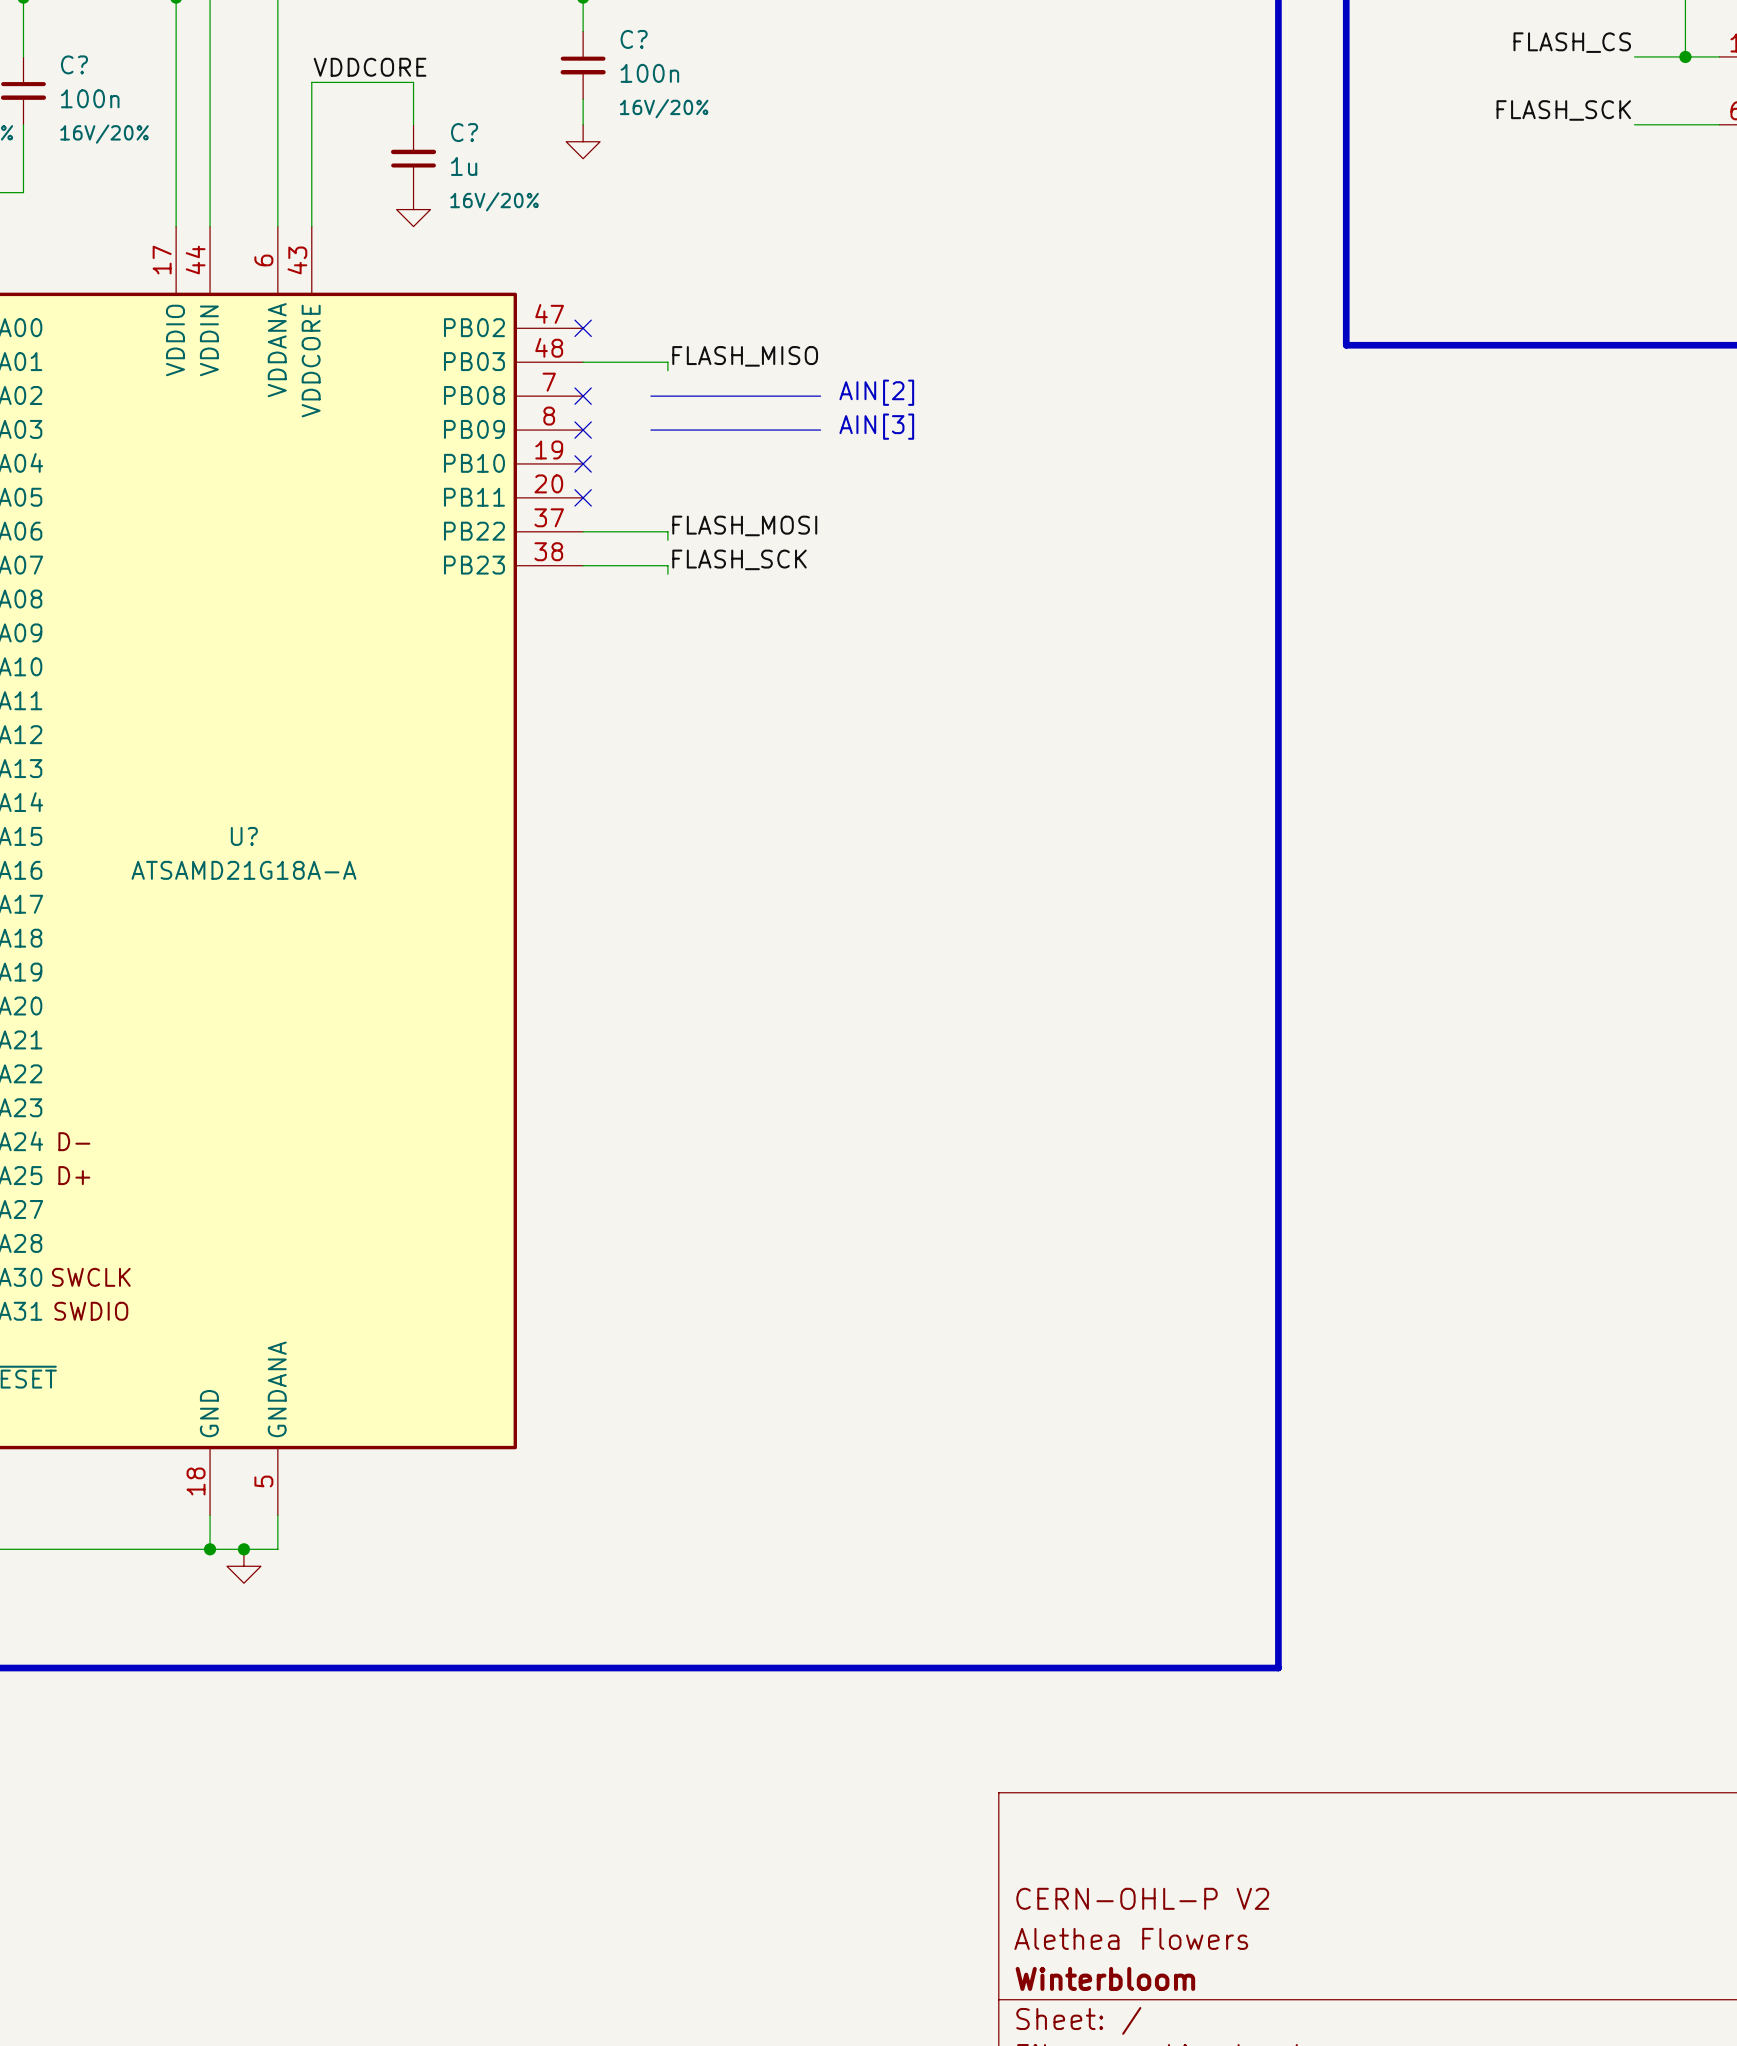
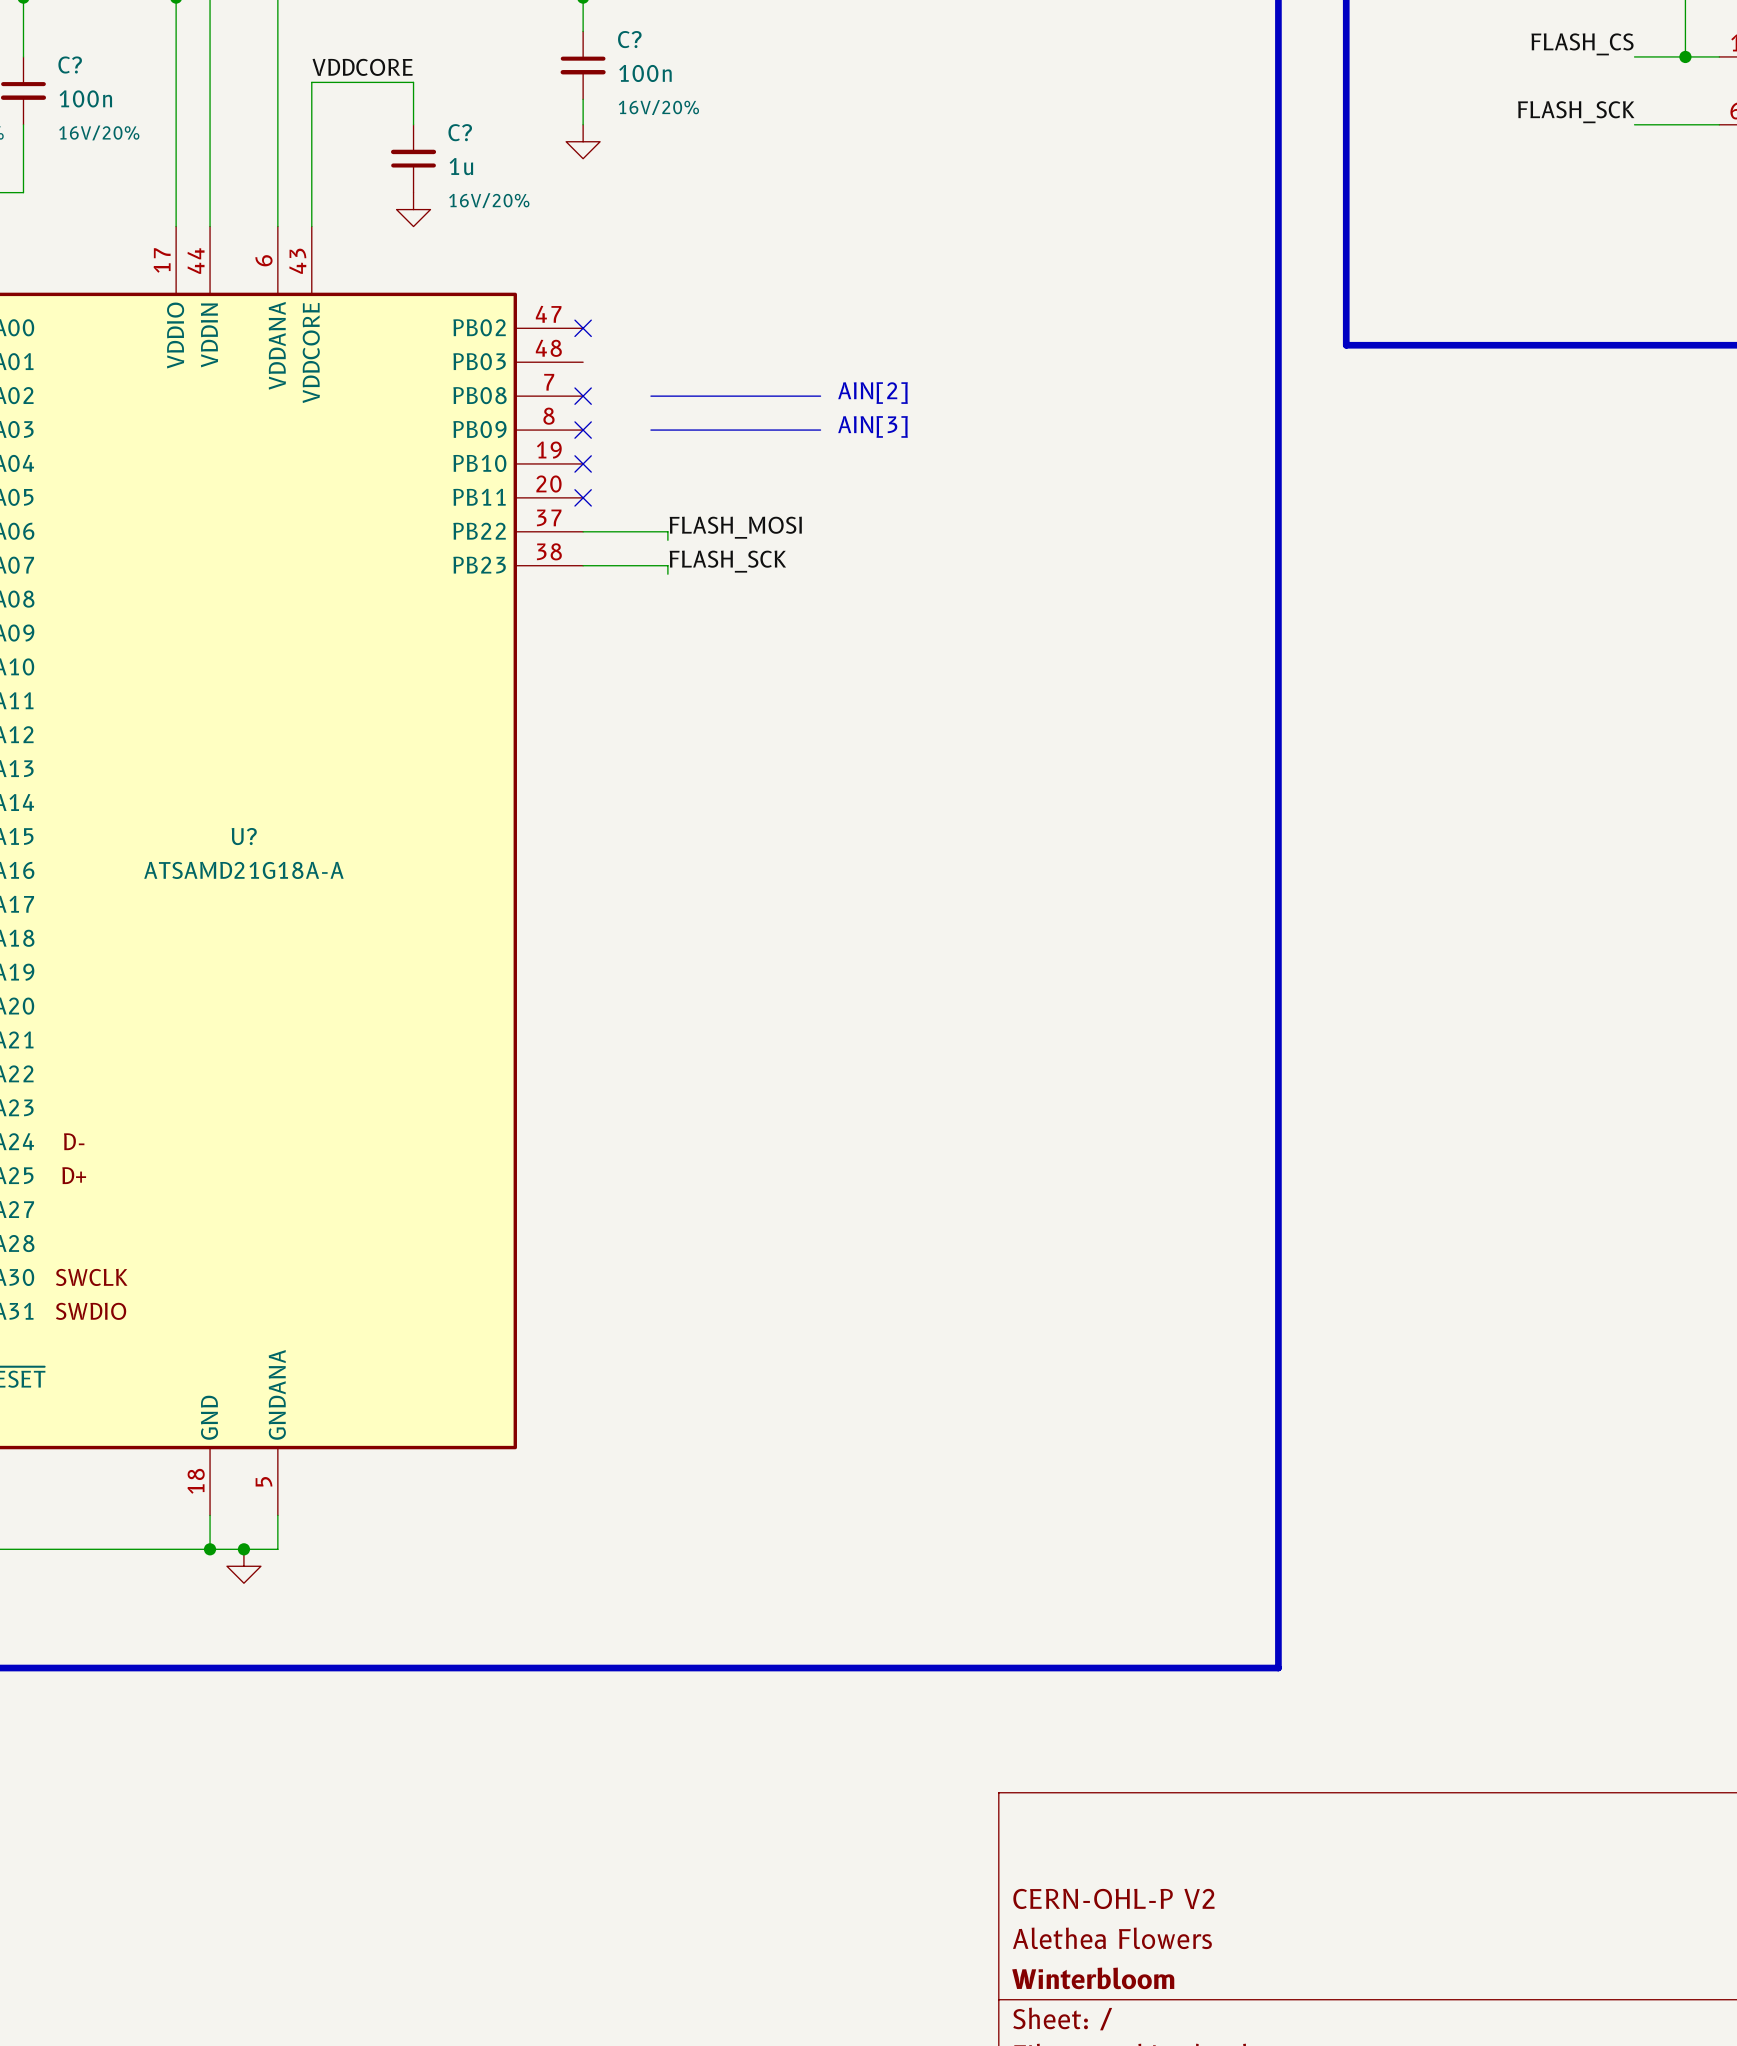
label: FLASH_MISO (745, 356) -> none
wire: (583, 362) (667, 362) (667, 370) -> none

